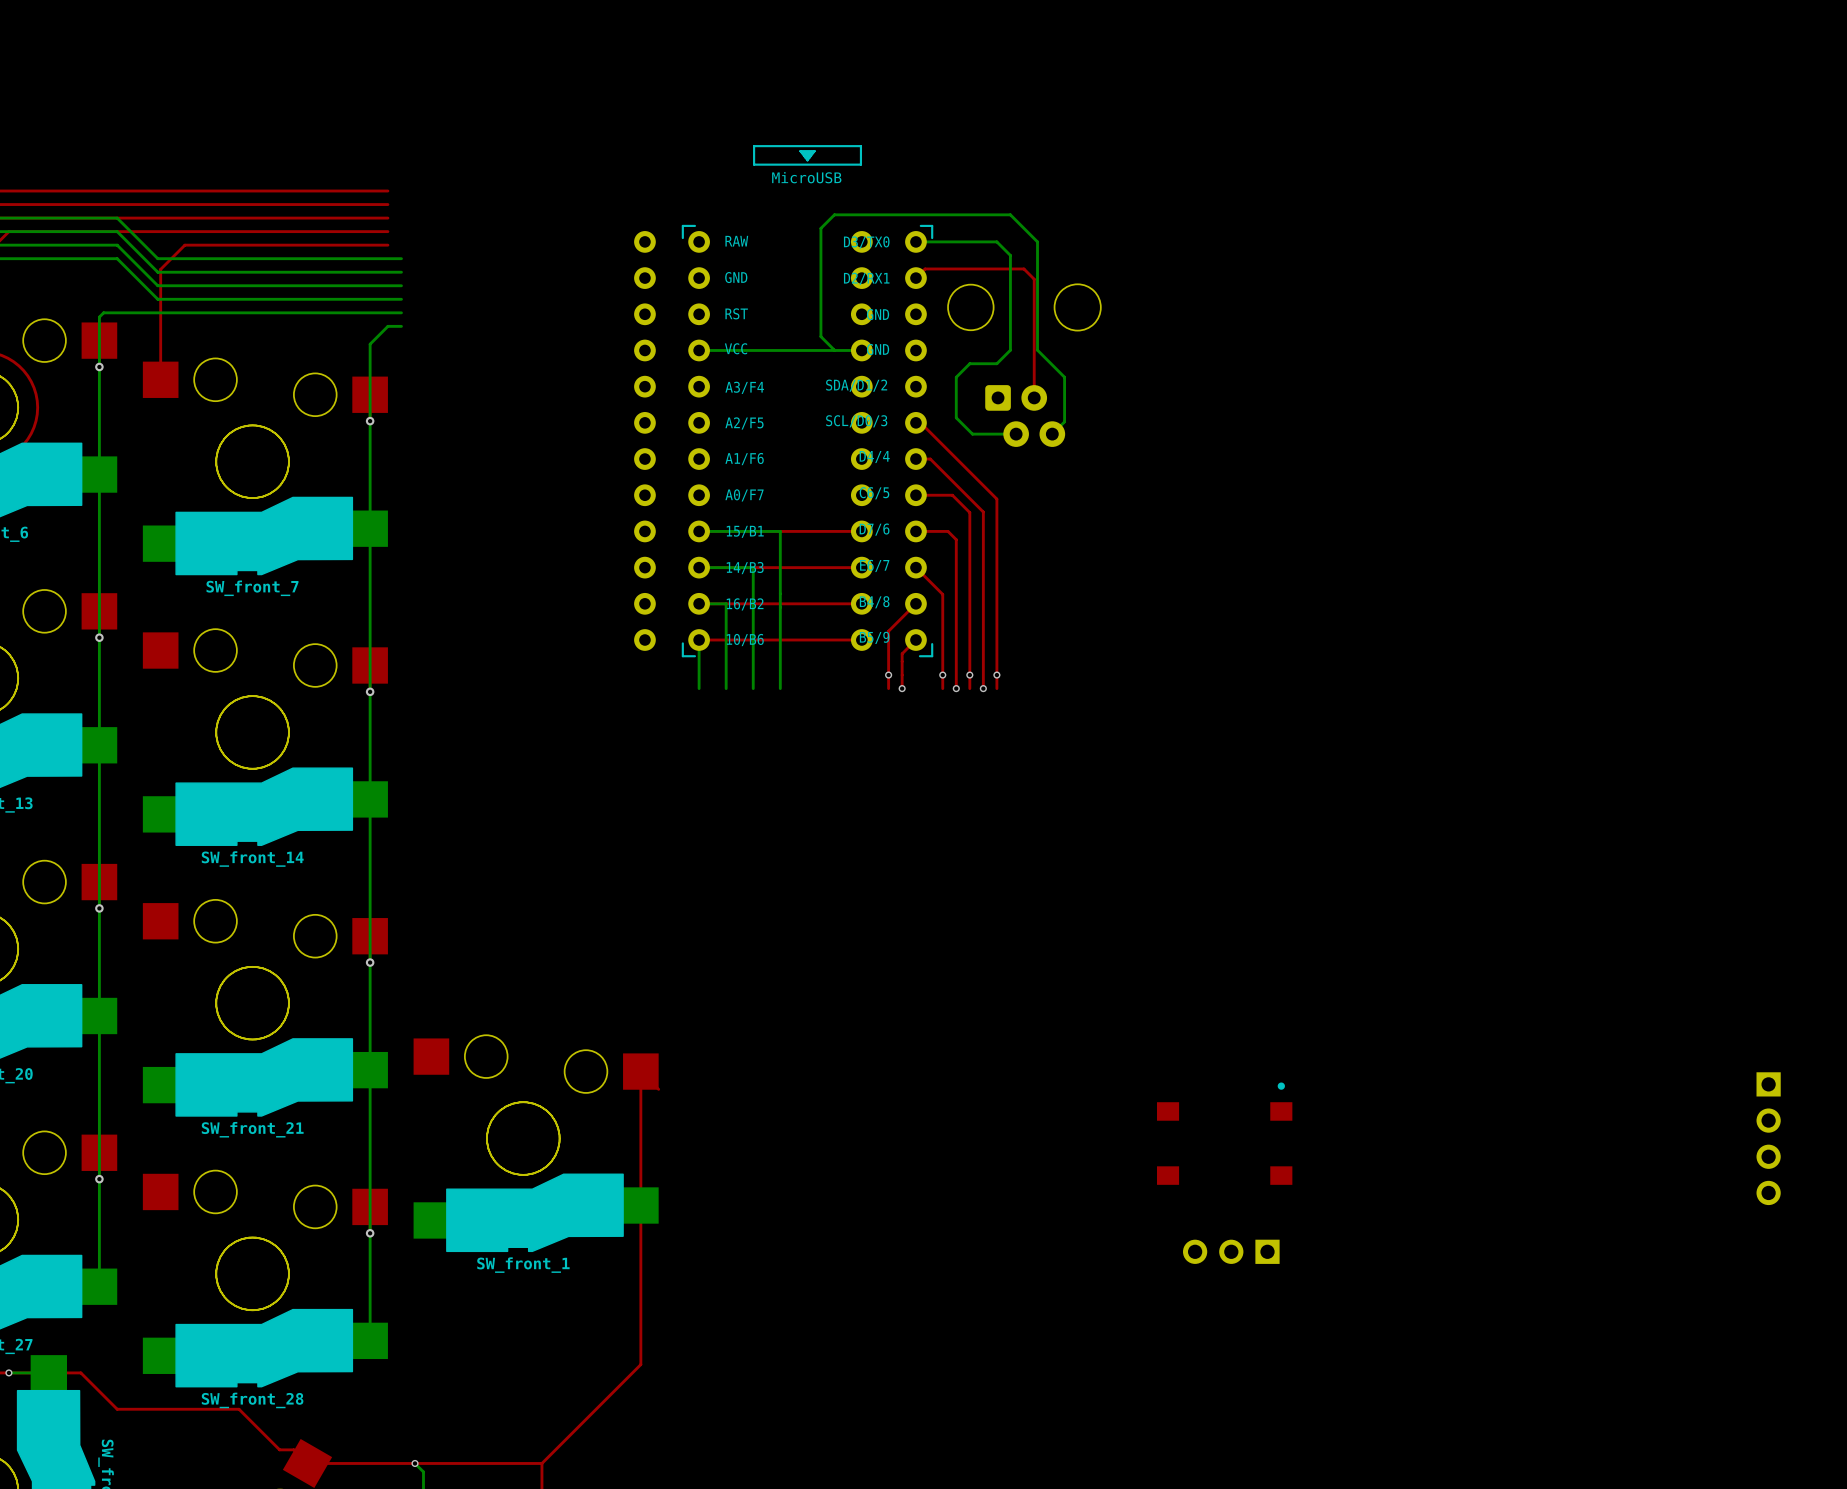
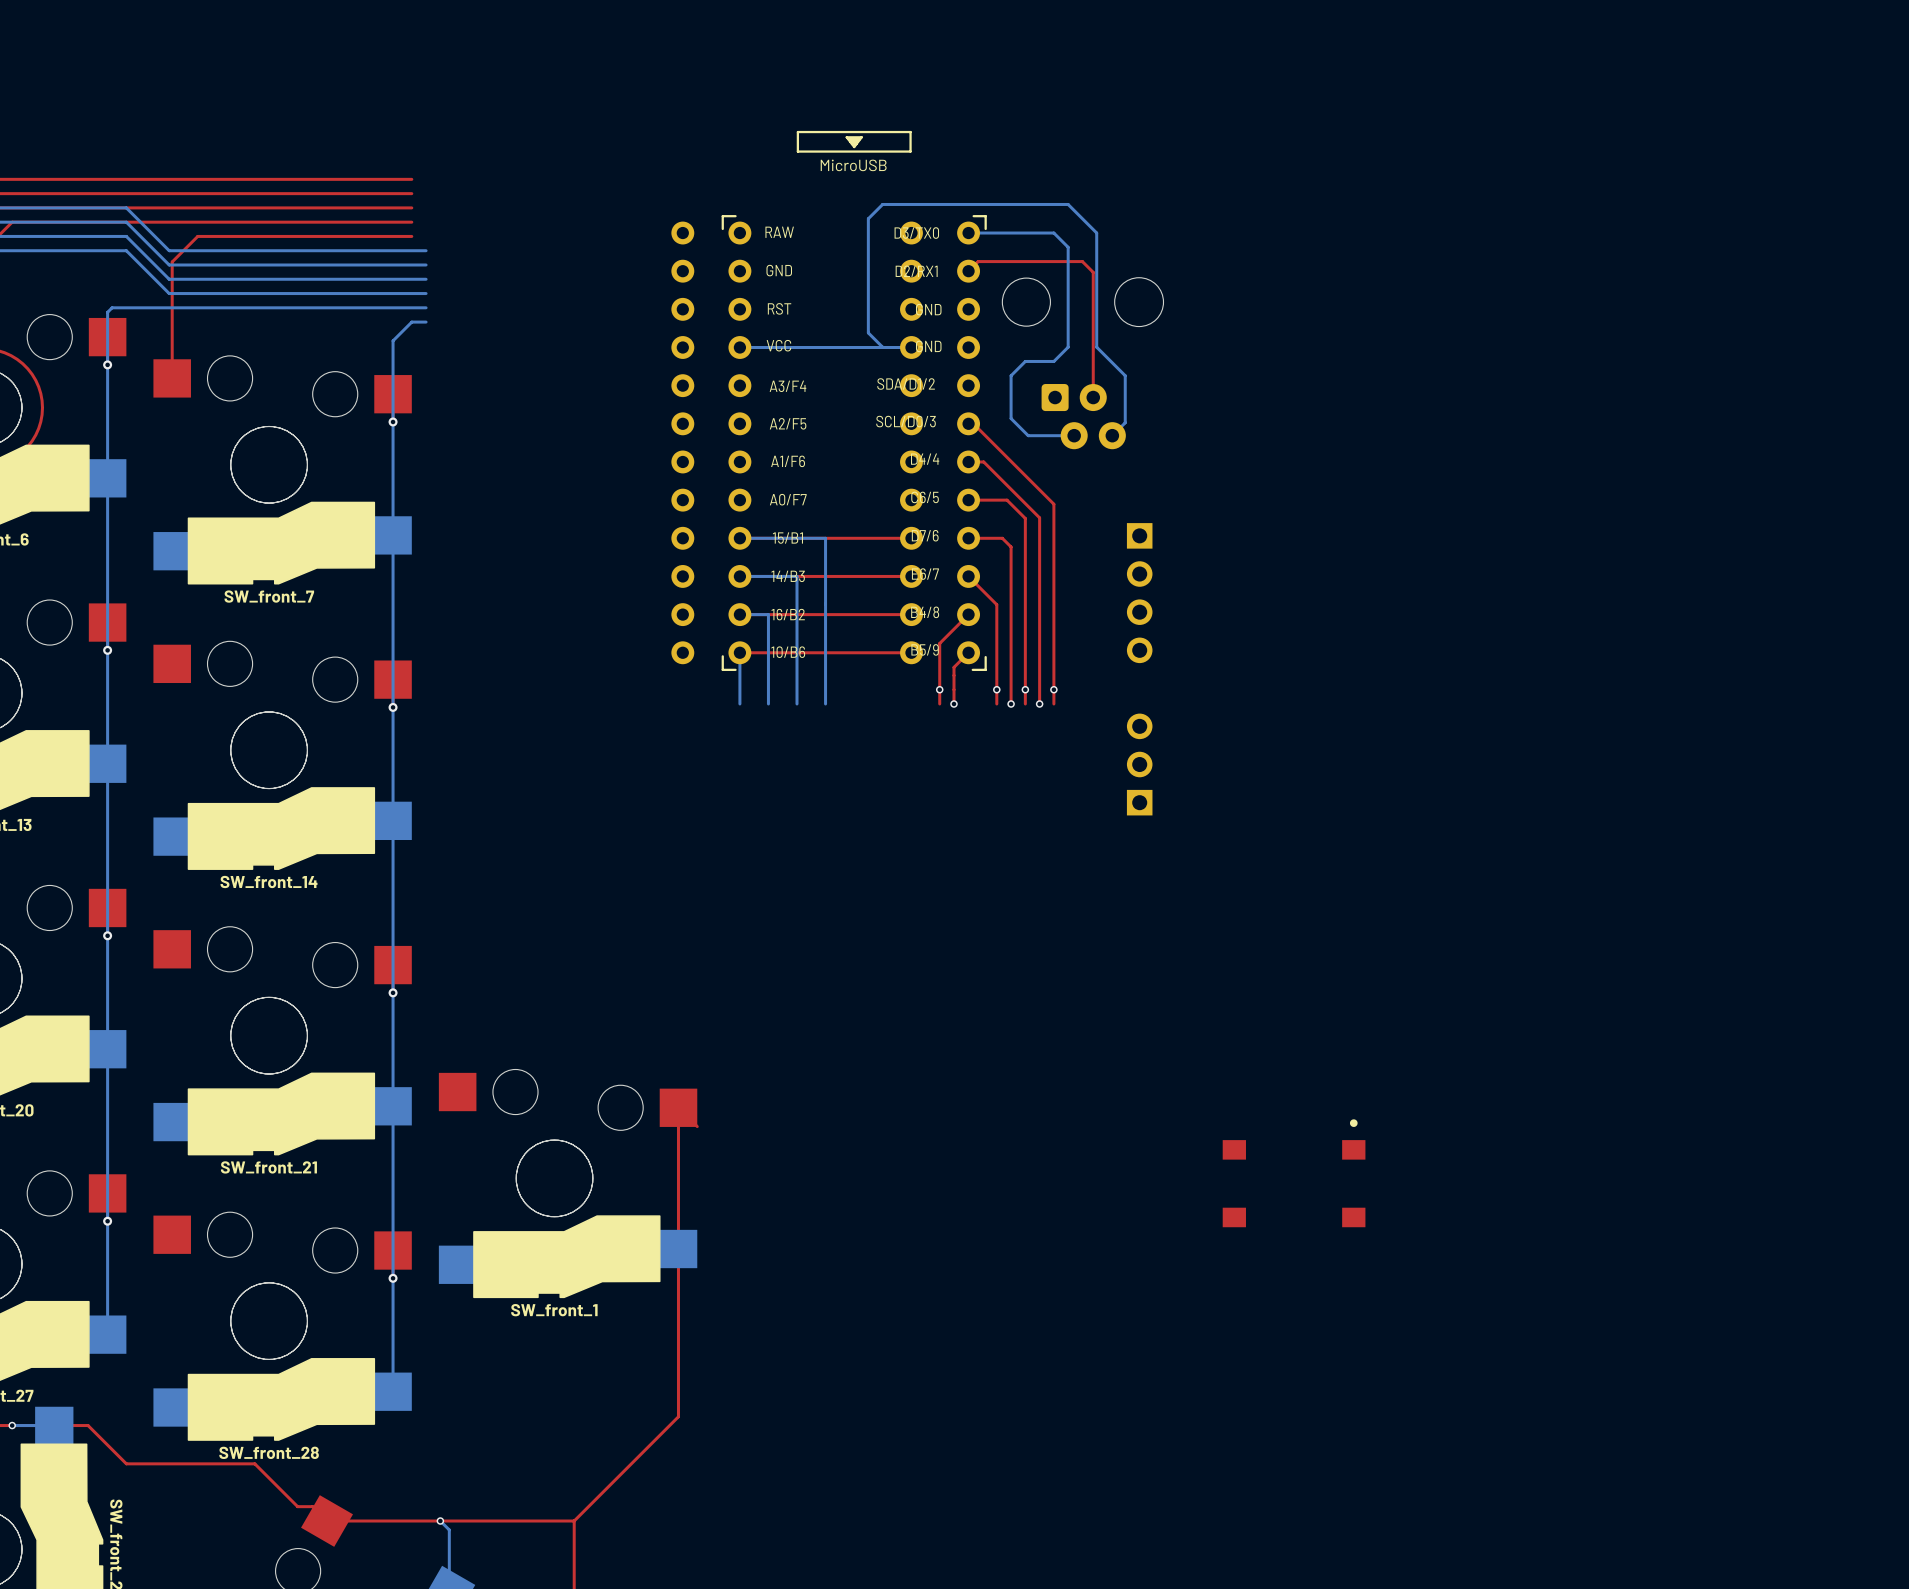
part: none -> (1139, 593)
part: none -> (1139, 764)
part: (1768, 1138) -> none
part: (1231, 1251) -> none

